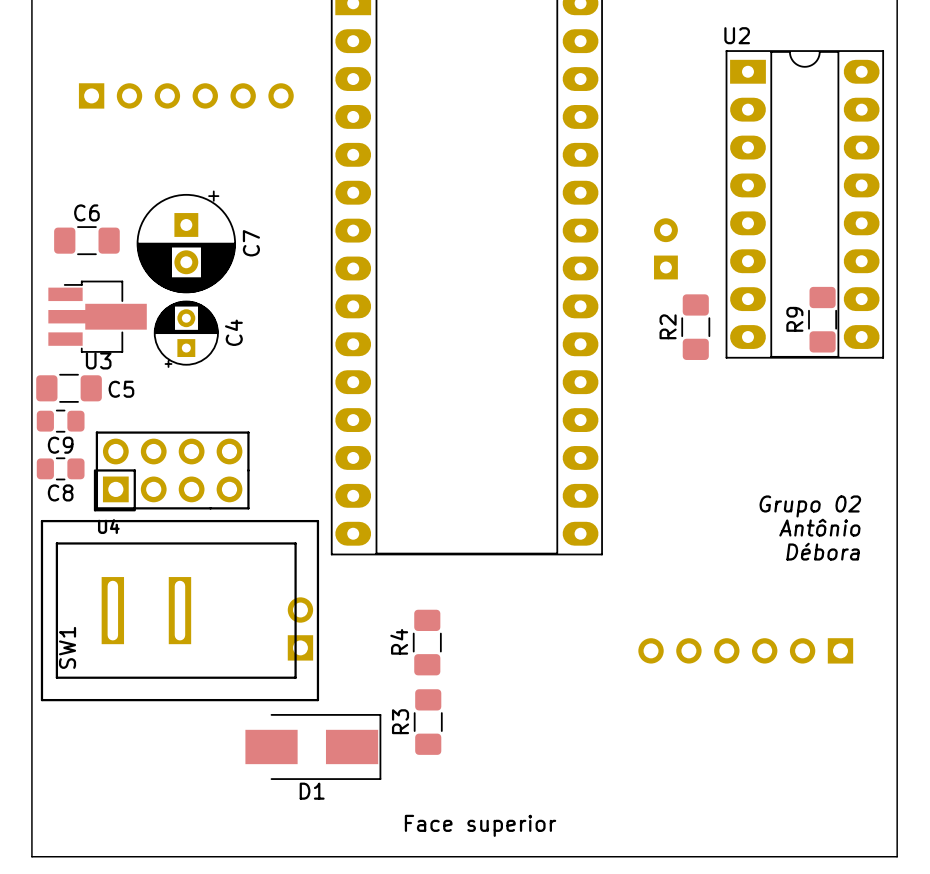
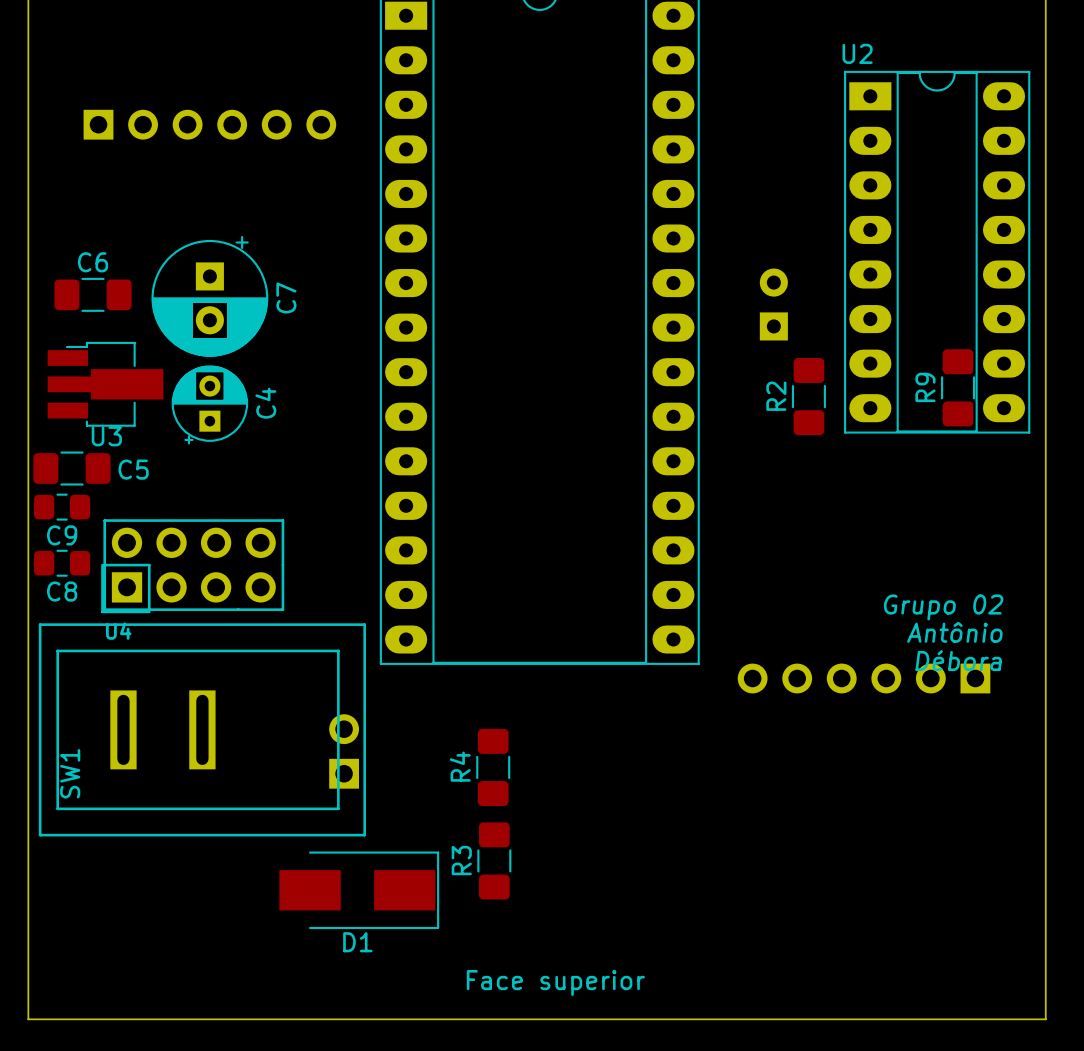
part position: (745, 650) -> (864, 678)

